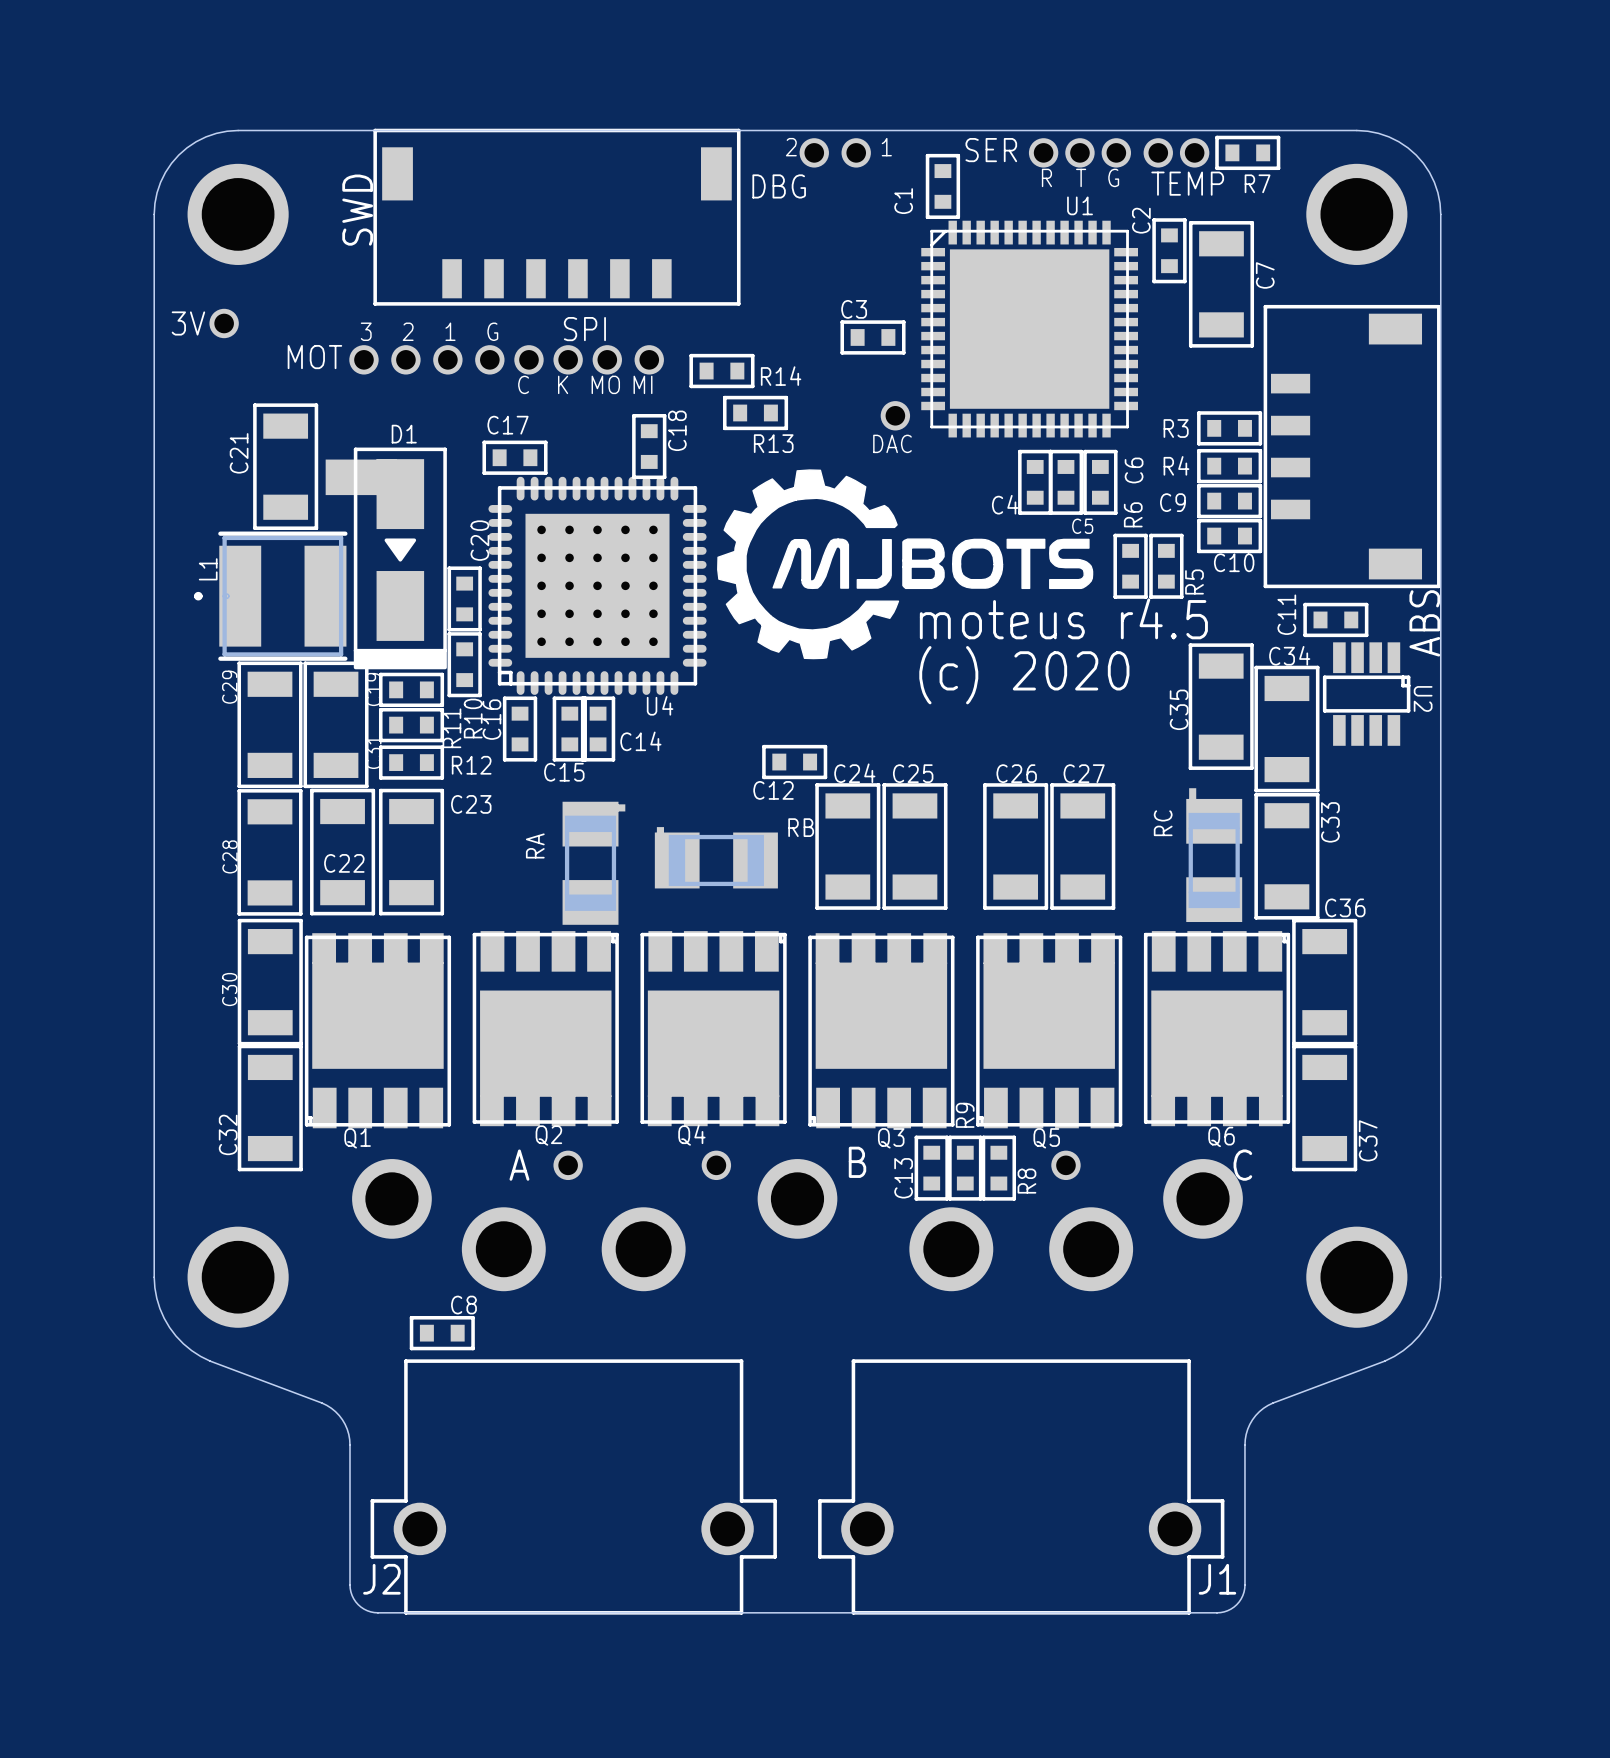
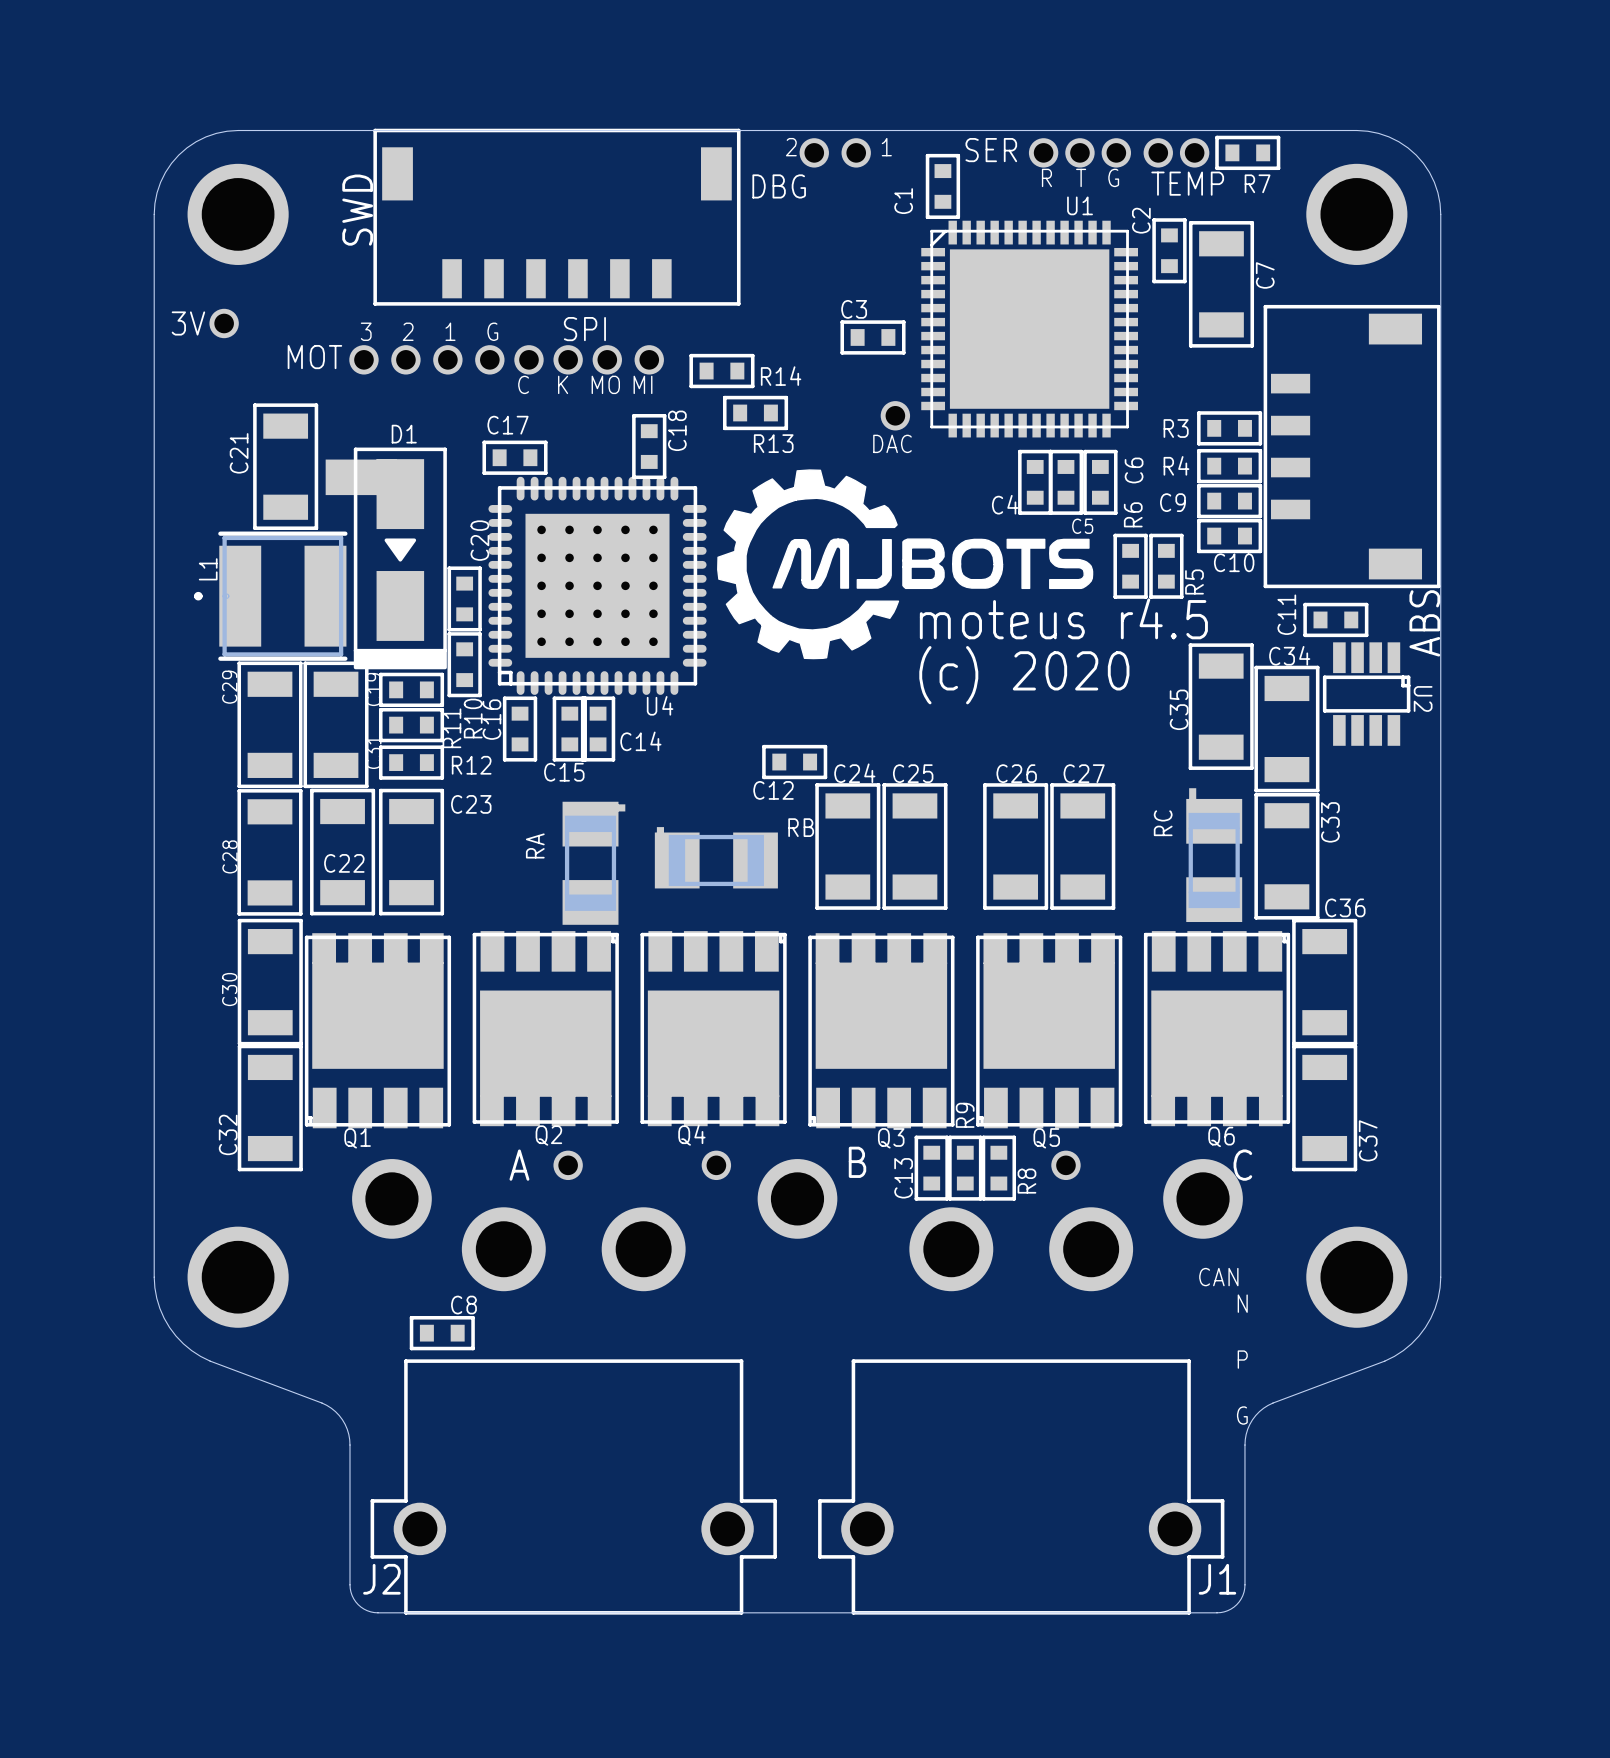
text: none -> CAN (1218, 1277)
text: none -> N (1242, 1303)
text: none -> P (1242, 1359)
text: none -> G (1242, 1415)

